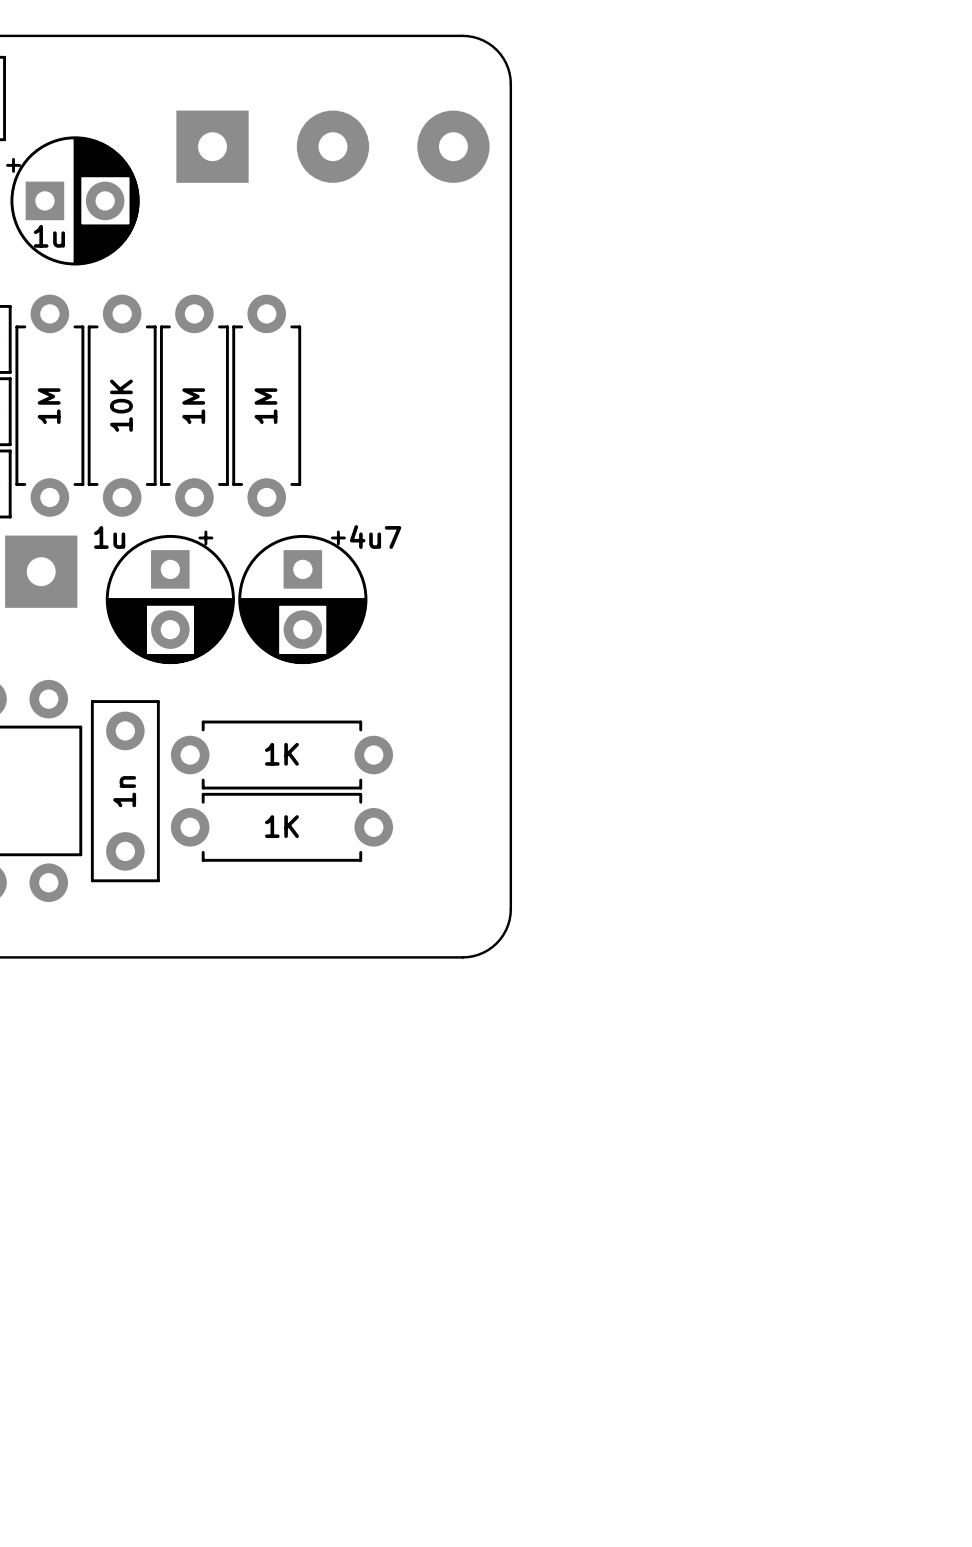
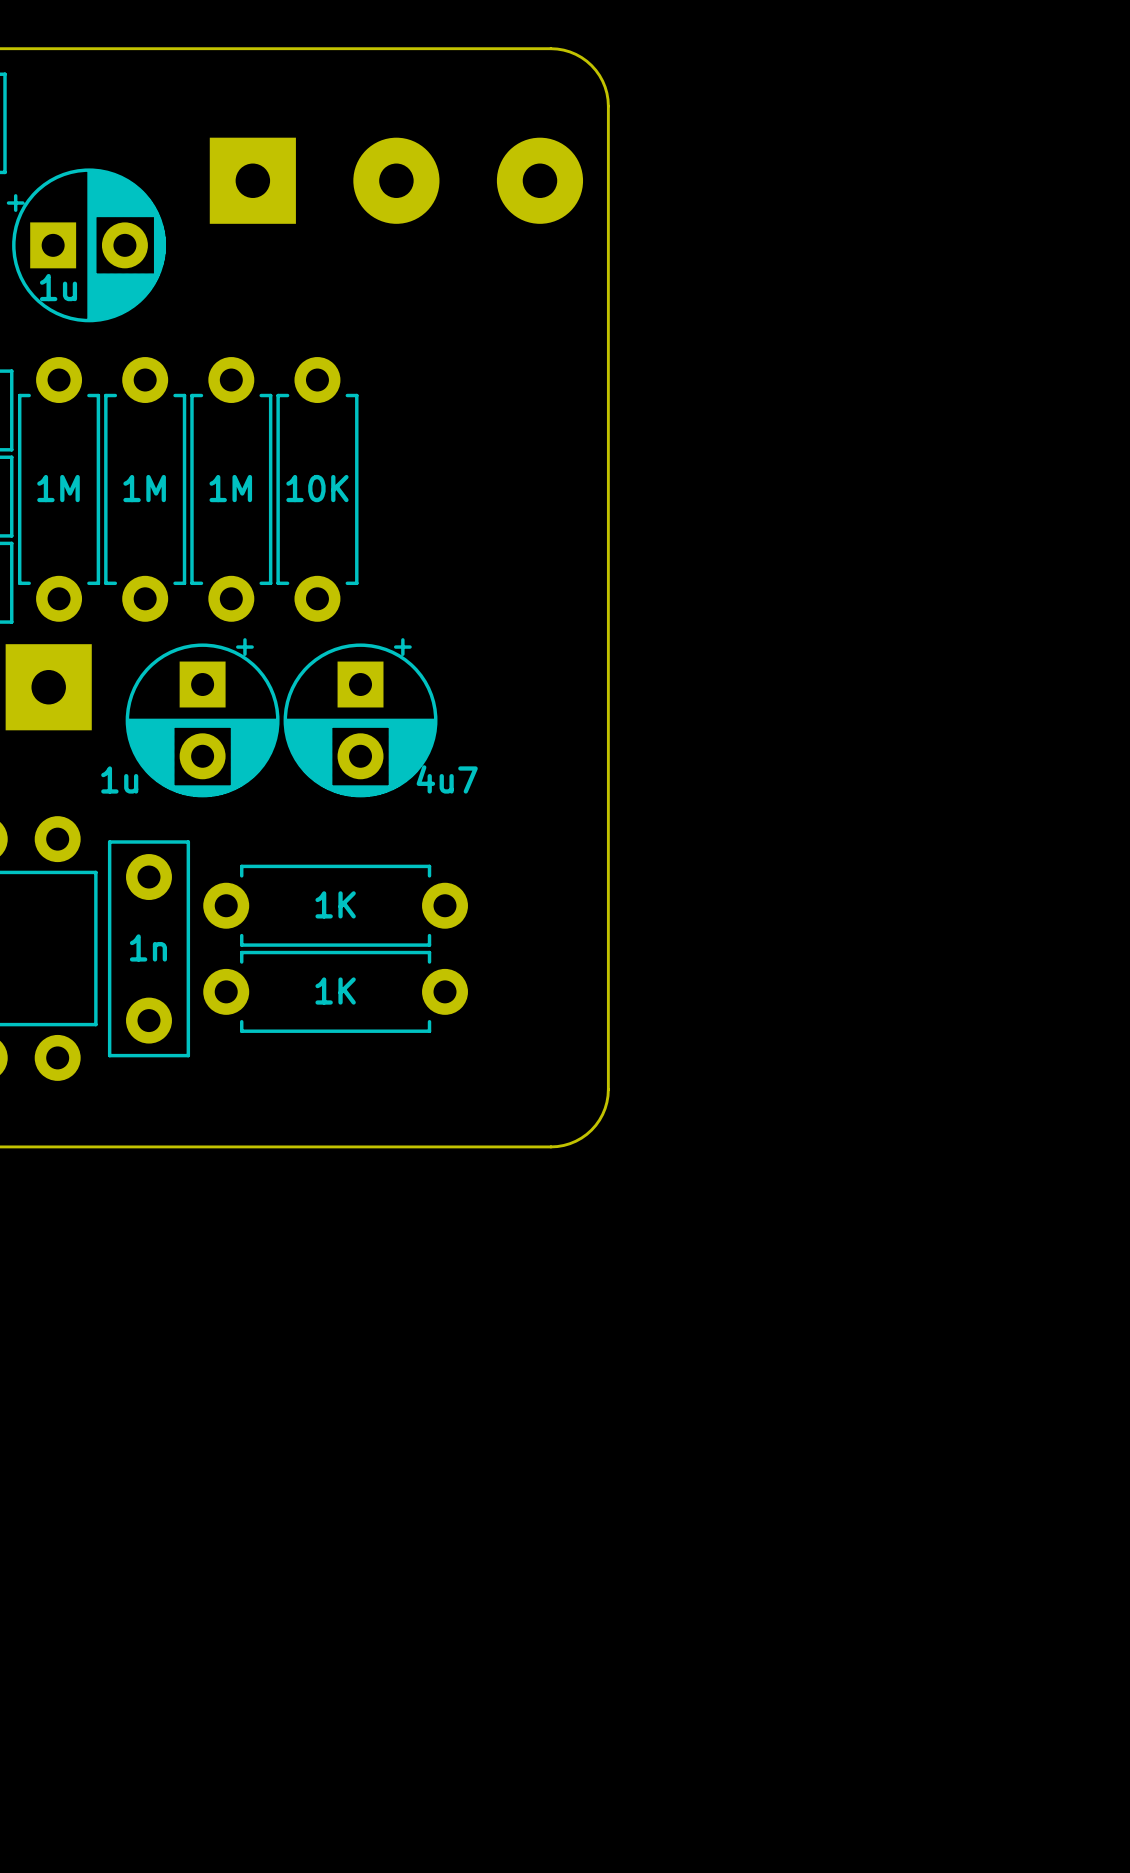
part value: 10K (121, 405) -> 1M (144, 488)
part value rotation: 0° (49, 406) -> 90° clockwise (58, 488)
part value rotation: 0° (193, 406) -> 90° clockwise (230, 488)
part value: 1M (265, 406) -> 10K (317, 488)
part value position: 1u (109, 537) -> 1u (119, 779)
part value position: 4u7 (375, 537) -> 4u7 (447, 779)
part value rotation: 0° (124, 791) -> 90° clockwise (148, 947)

